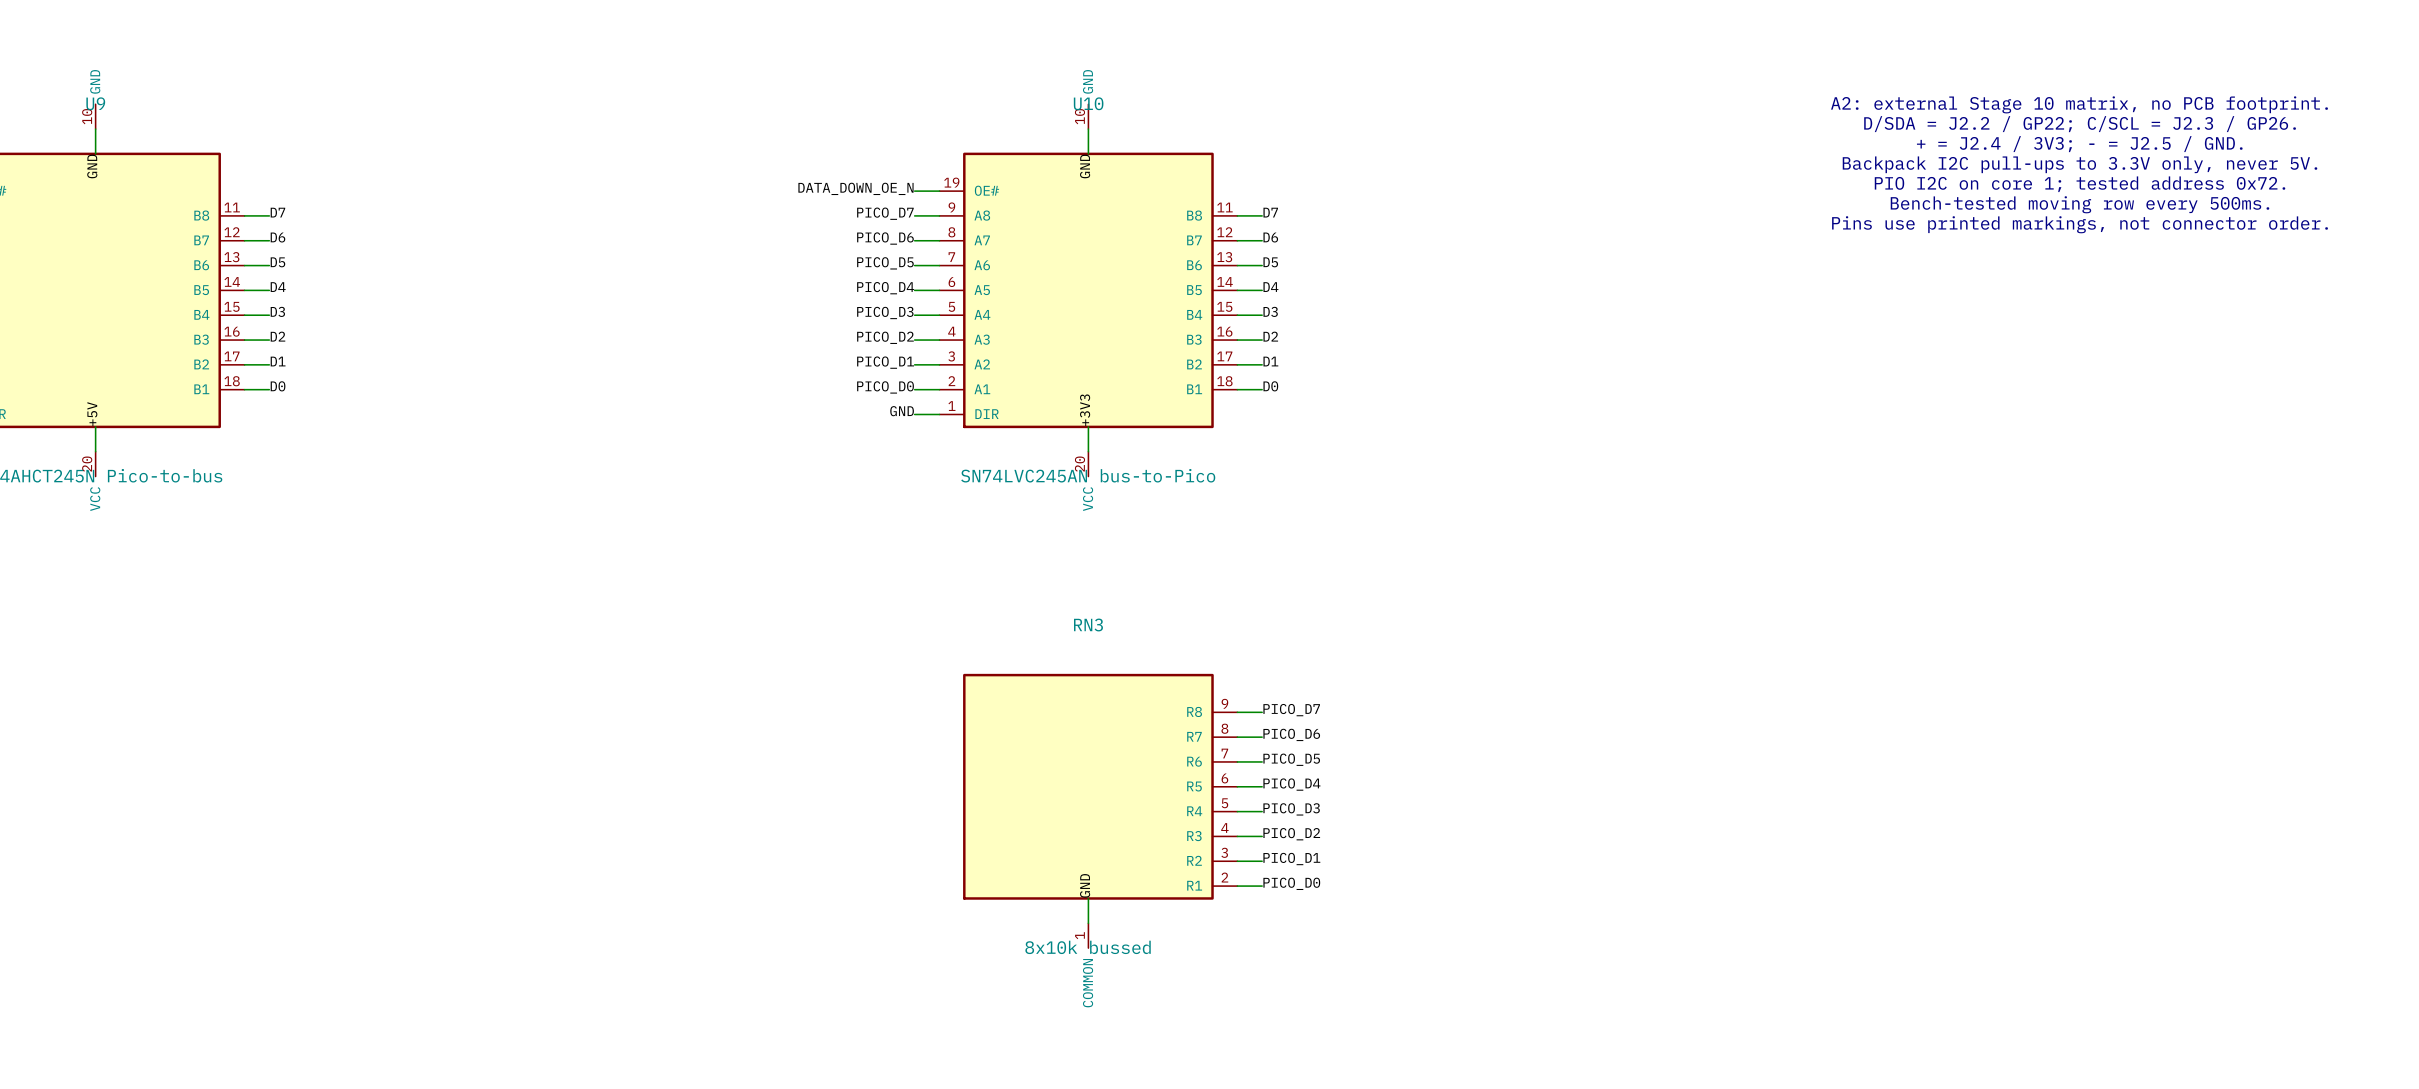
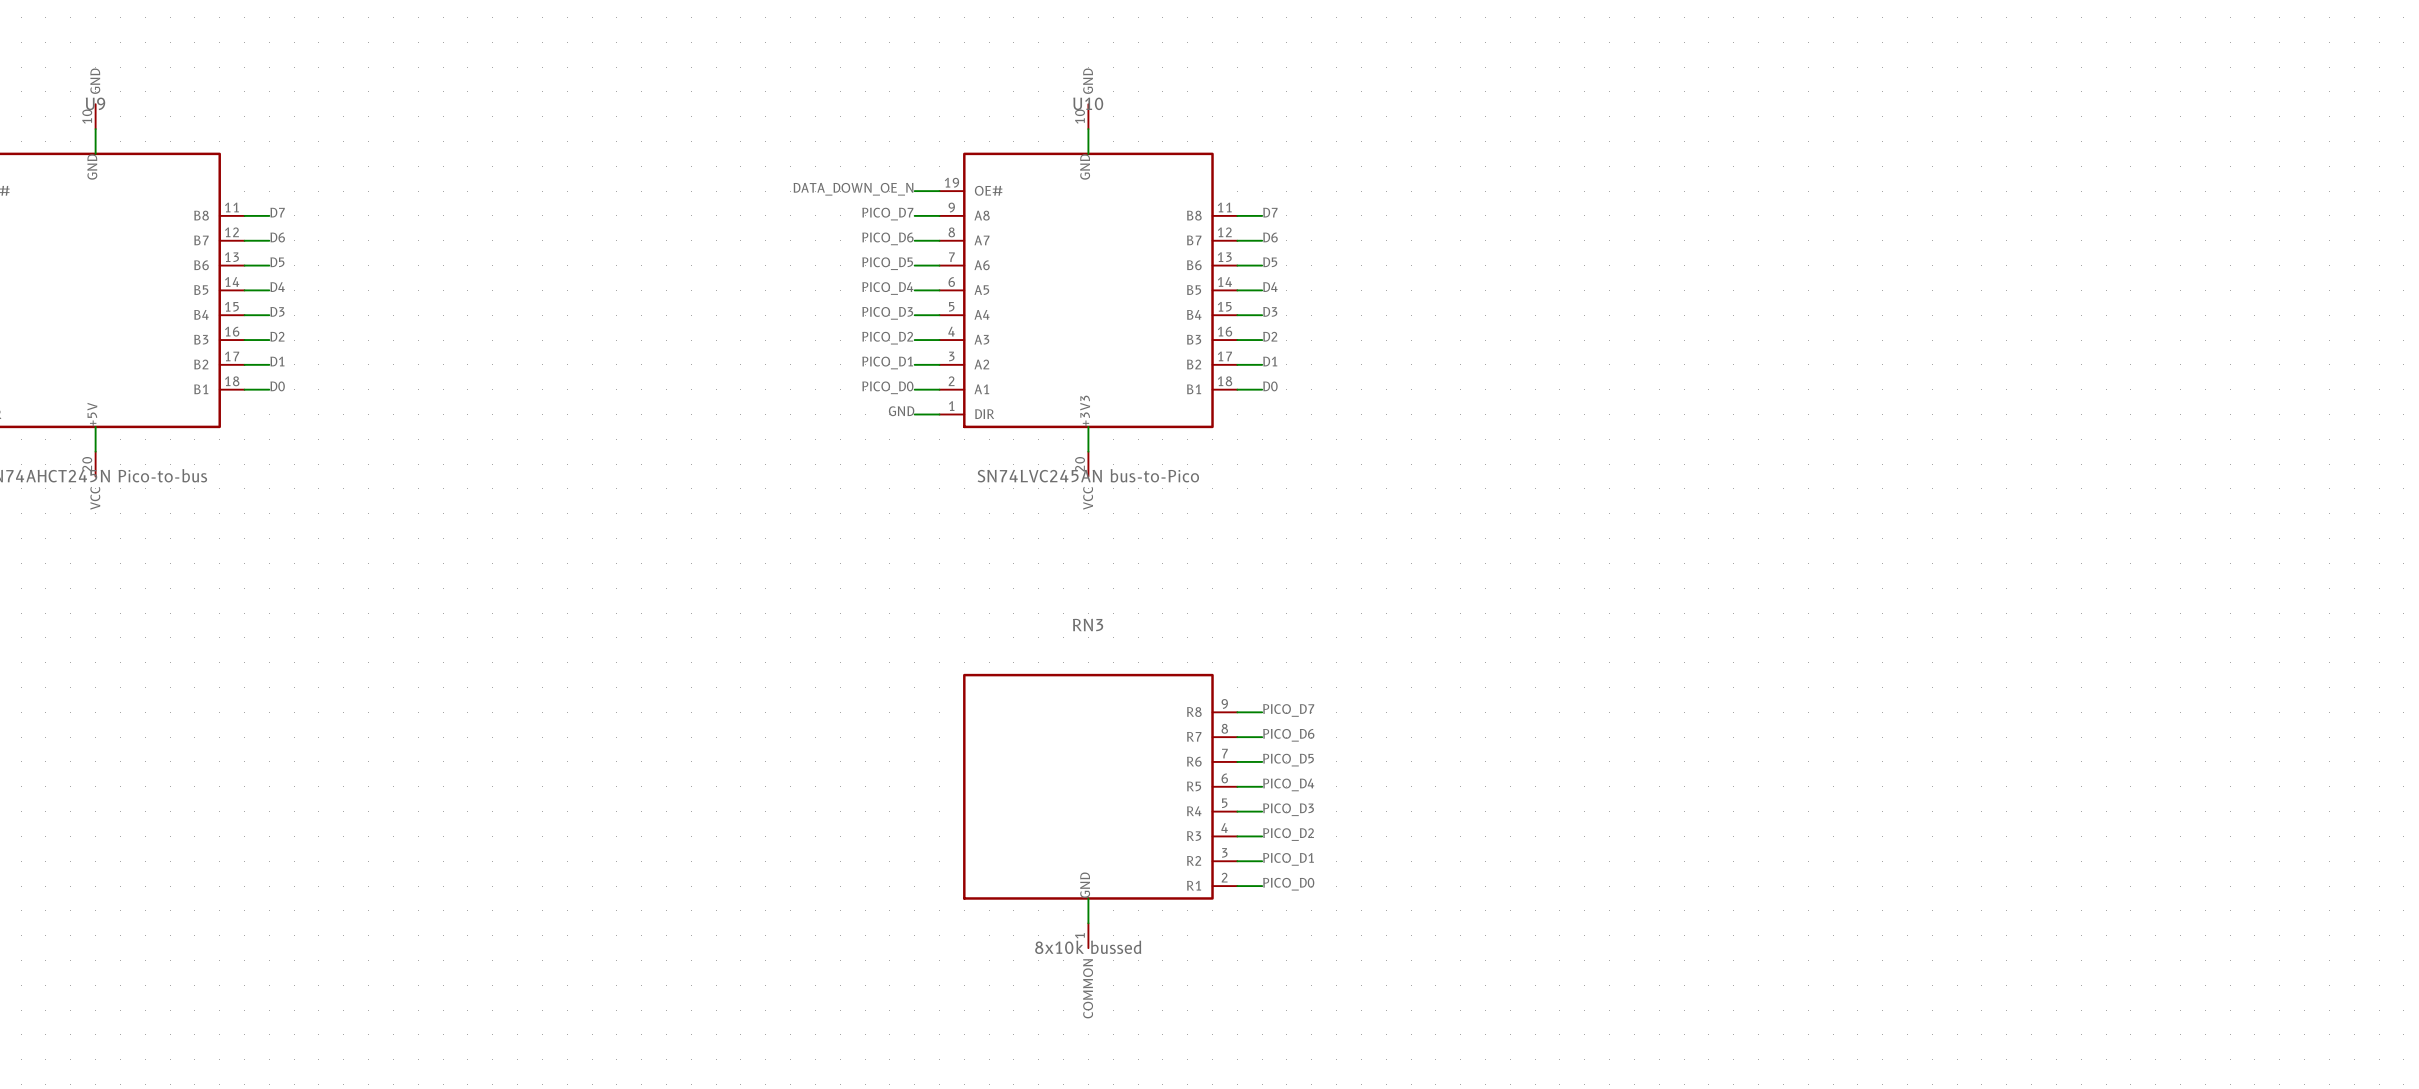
text: A2: external Stage 10 matrix, no PCB footprint. (2079, 104) -> none
text: D/SDA = J2.2 / GP22; C/SCL = J2.3 / GP26. (2080, 124) -> none
text: + = J2.4 / 3V3; - = J2.5 / GND. (2079, 144) -> none
text: Backpack I2C pull-ups to 3.3V only, never 5V. (2079, 164) -> none
text: PIO I2C on core 1; tested address 0x72. (2080, 184) -> none
text: Bench-tested moving row every 500ms. (2079, 204) -> none
text: Pins use printed markings, not connector order. (2080, 224) -> none

